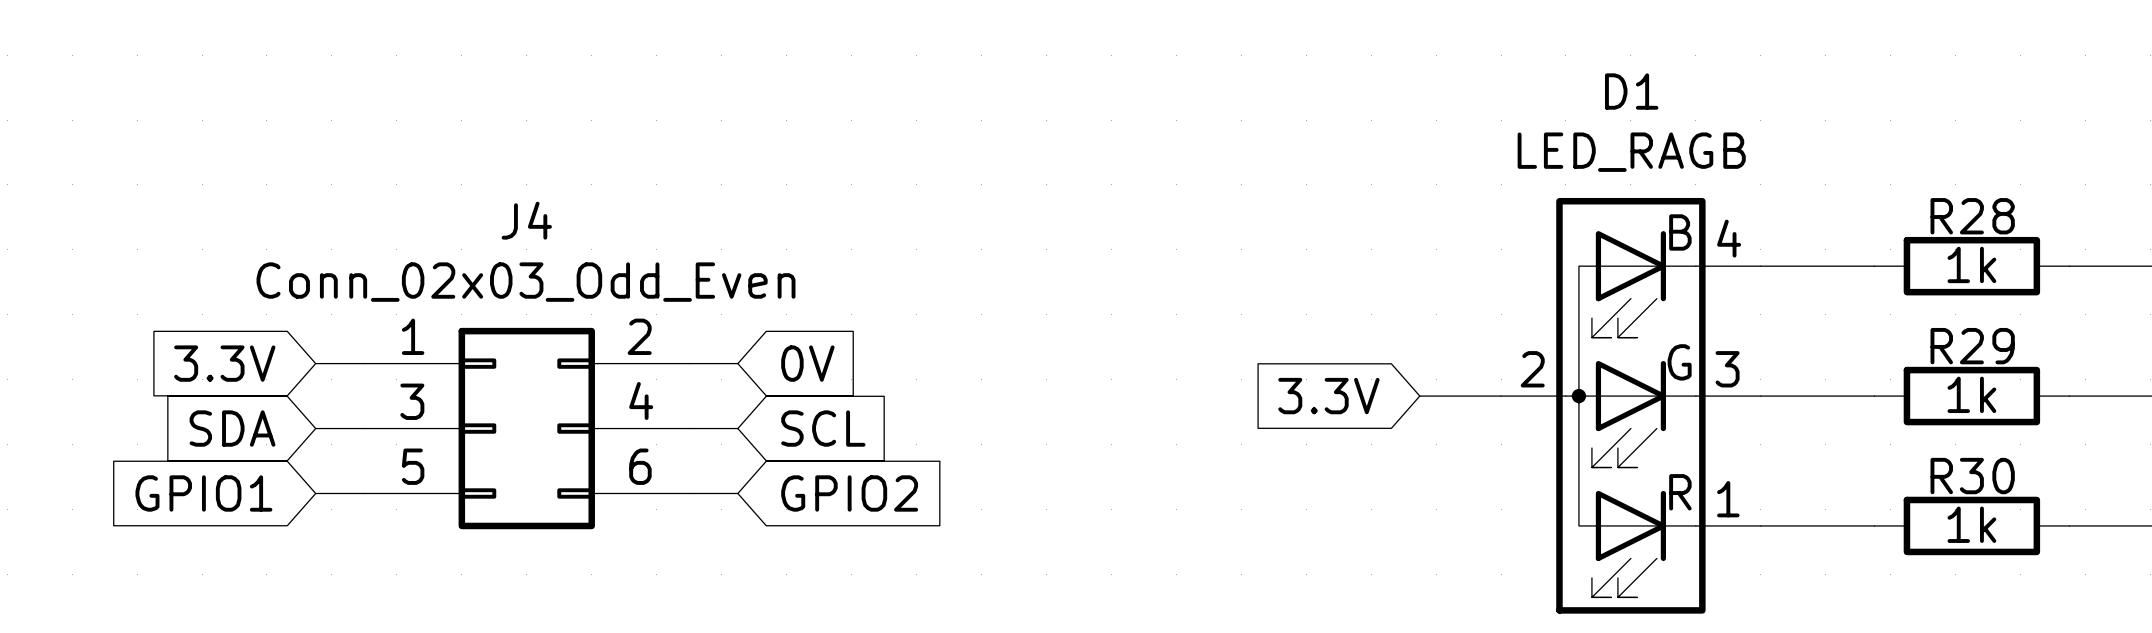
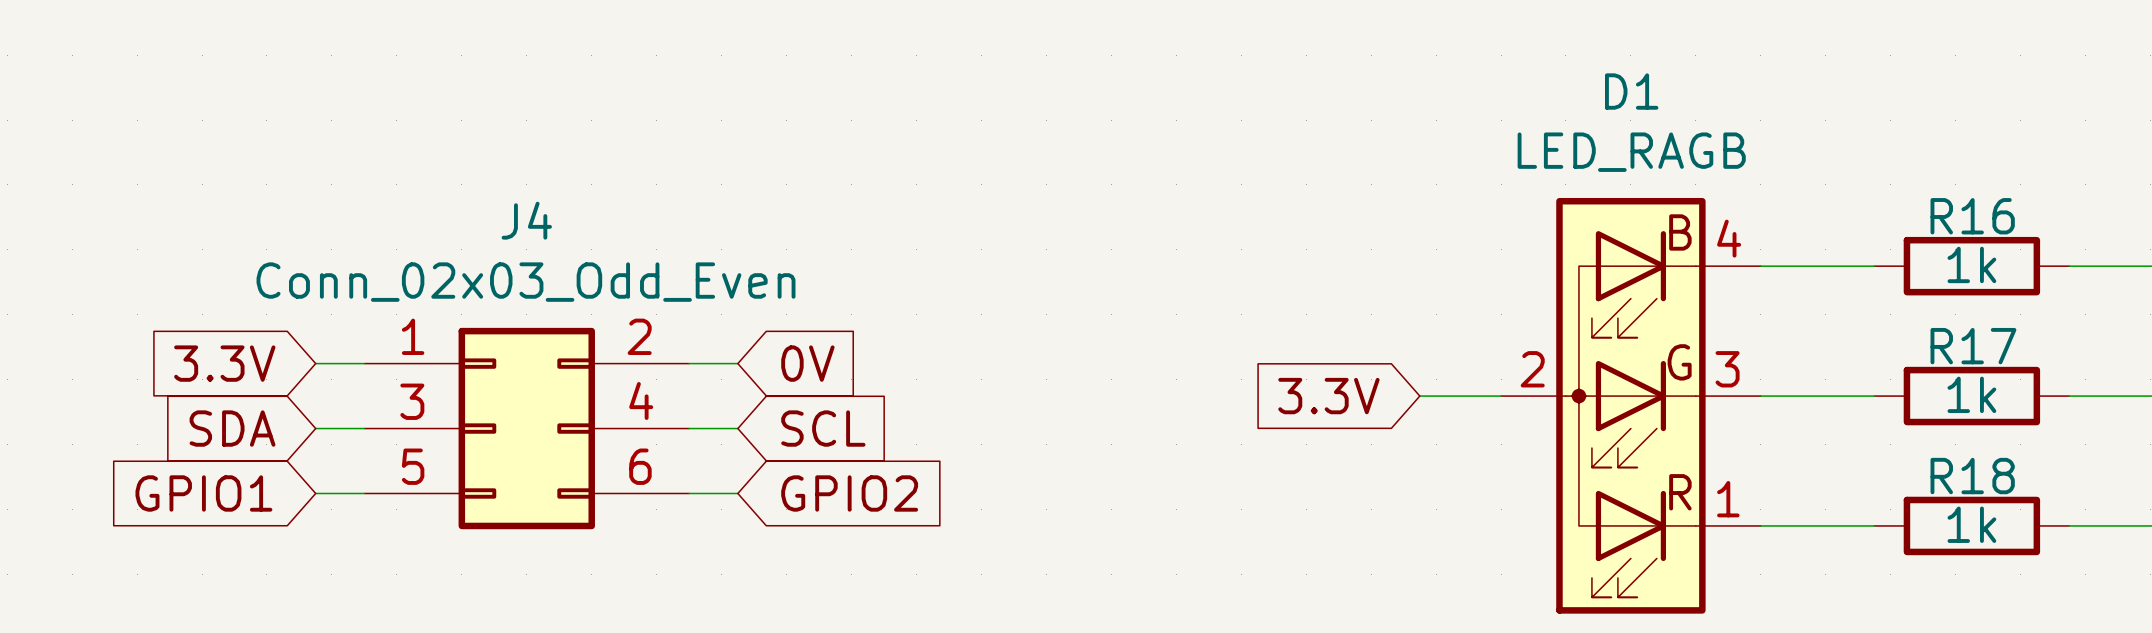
R28 name: R28 (1972, 216) -> R16 (1972, 216)
R29 name: R29 (1972, 346) -> R17 (1973, 346)
R30 name: R30 (1972, 476) -> R18 (1972, 476)

